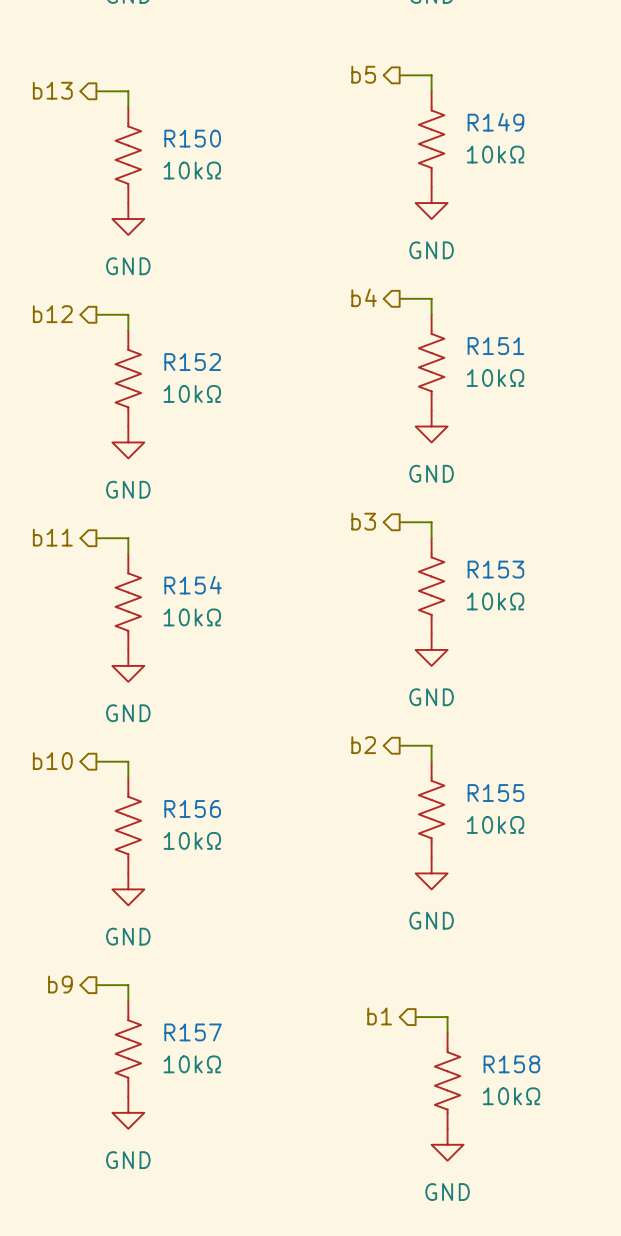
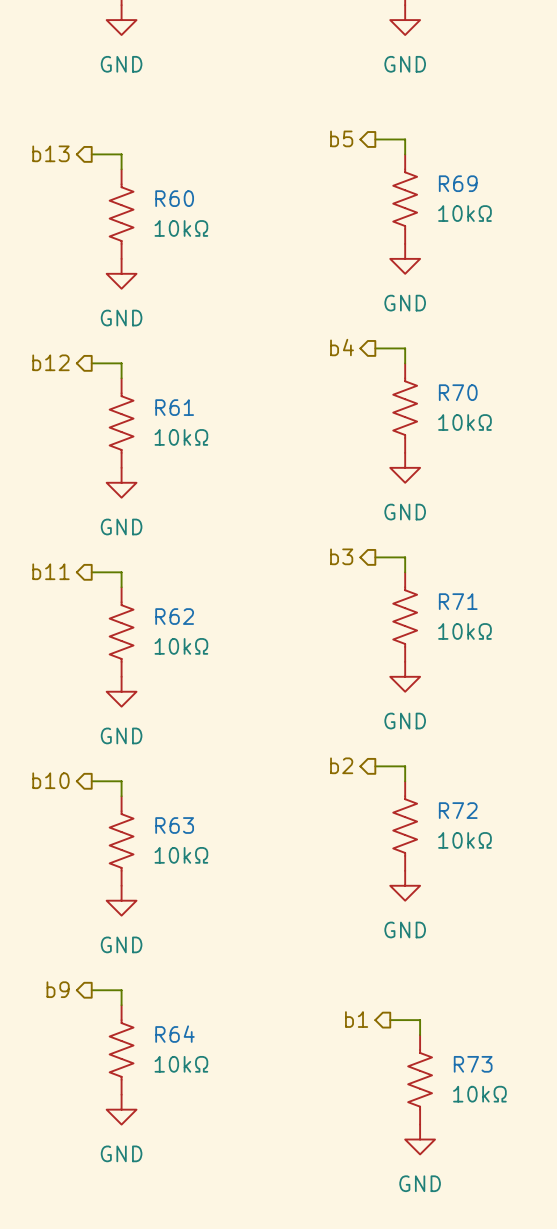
R149 name: R149 (495, 122) -> R69 (458, 183)
R150 name: R150 (192, 138) -> R60 (174, 198)
R151 name: R151 (495, 346) -> R70 (458, 392)
R152 name: R152 (192, 362) -> R61 (174, 407)
R153 name: R153 (495, 569) -> R71 (458, 601)
R154 name: R154 (193, 585) -> R62 (174, 616)
R155 name: R155 (495, 793) -> R72 (458, 810)
R156 name: R156 (192, 808) -> R63 (174, 825)
R157 name: R157 (193, 1032) -> R64 (175, 1034)
R158 name: R158 (511, 1064) -> R73 (473, 1064)

